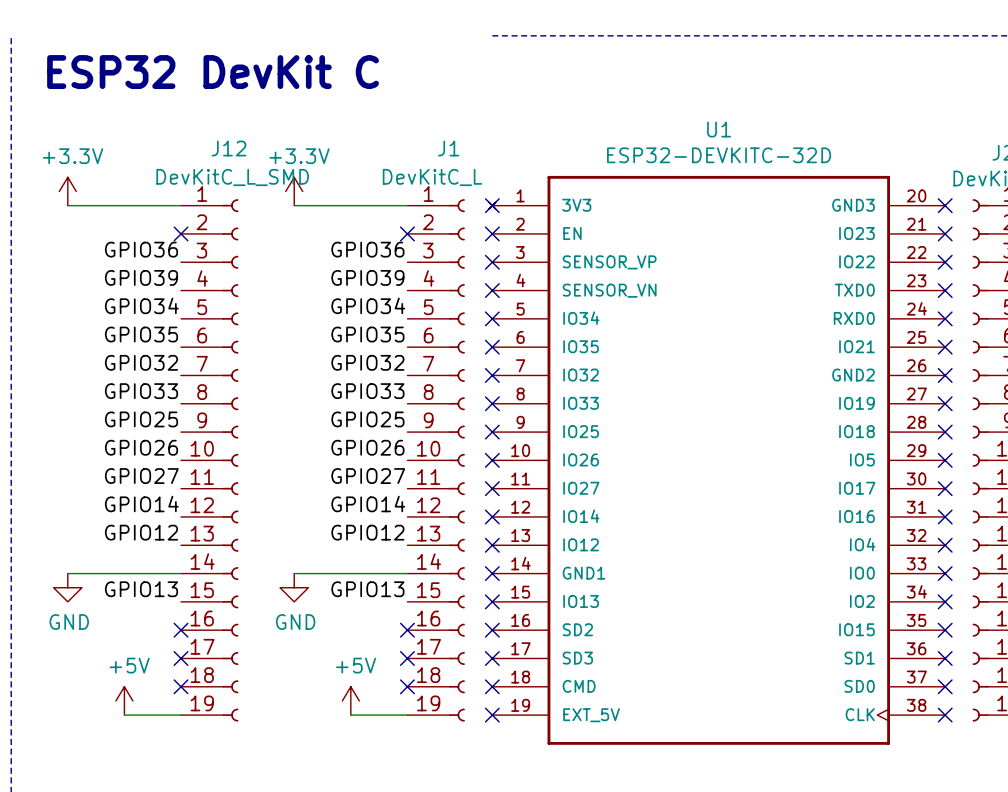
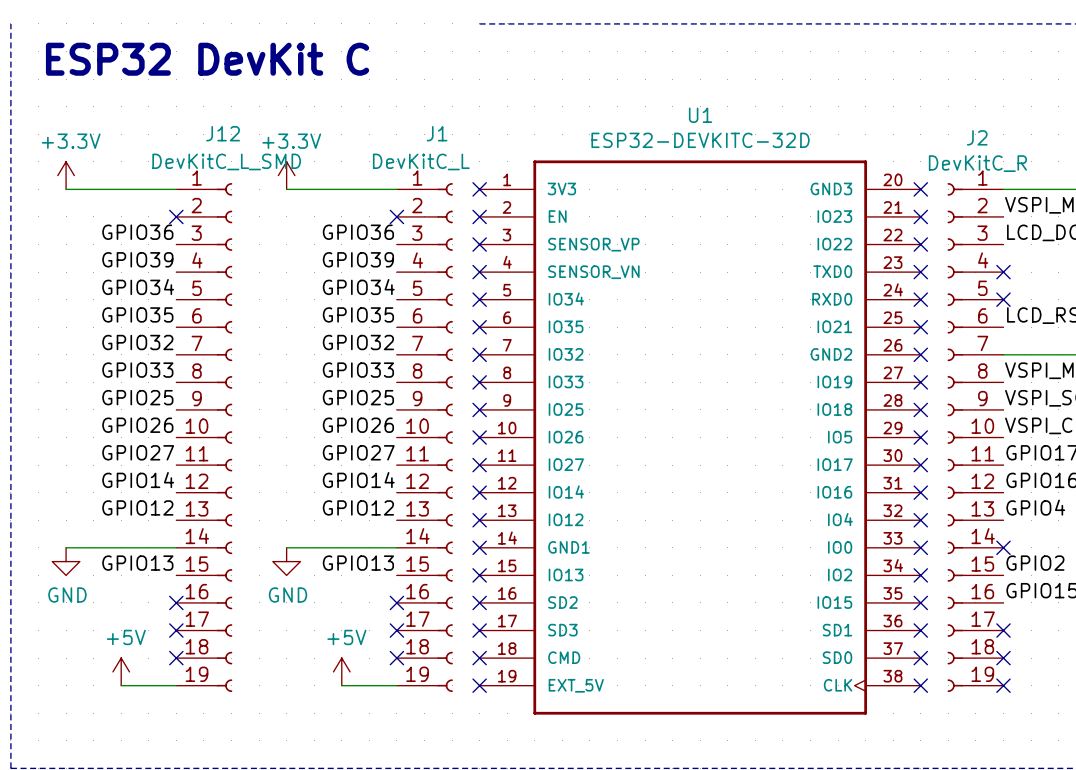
U1 symbol: [489, 175, 946, 745] -> [479, 160, 921, 715]

